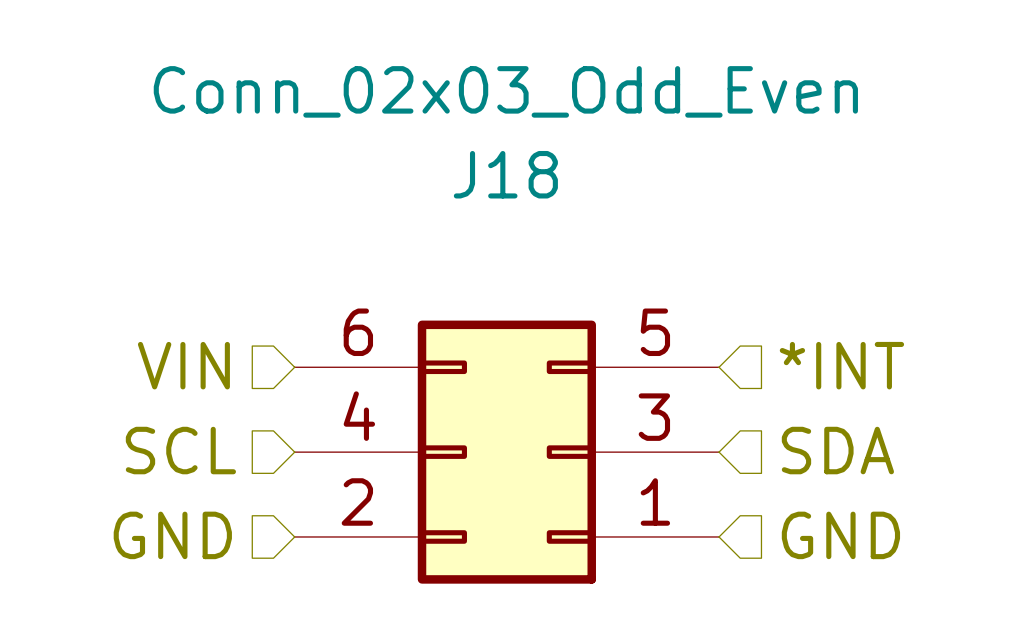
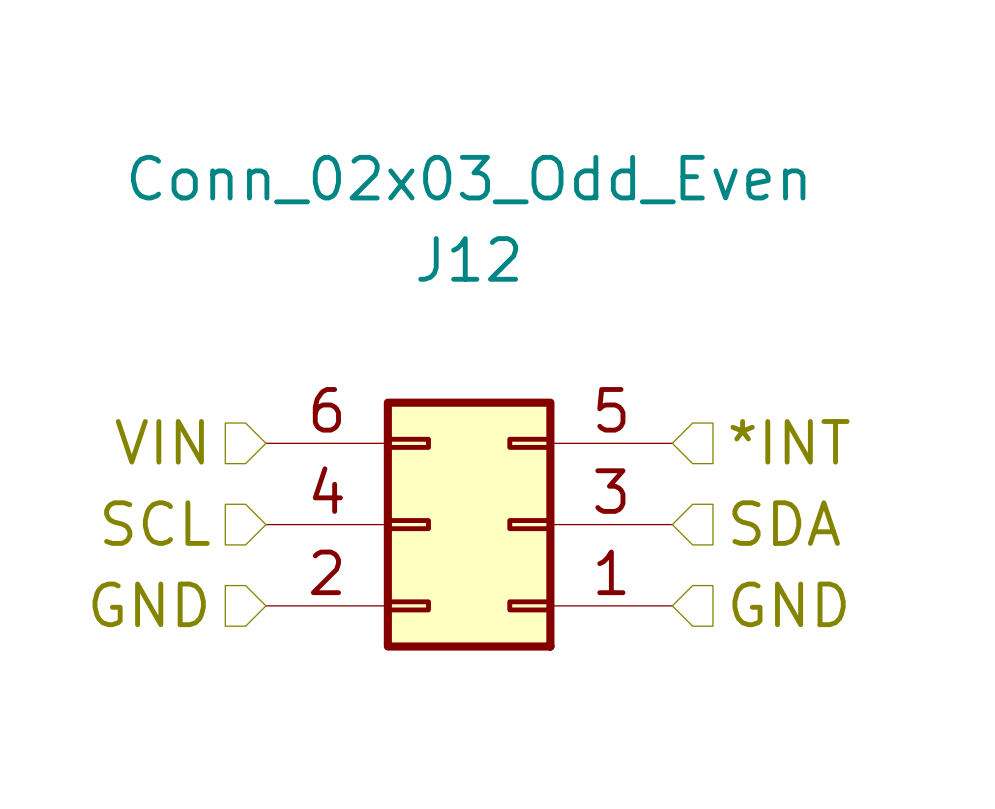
J18 name: J18 (505, 174) -> J12 (468, 258)

